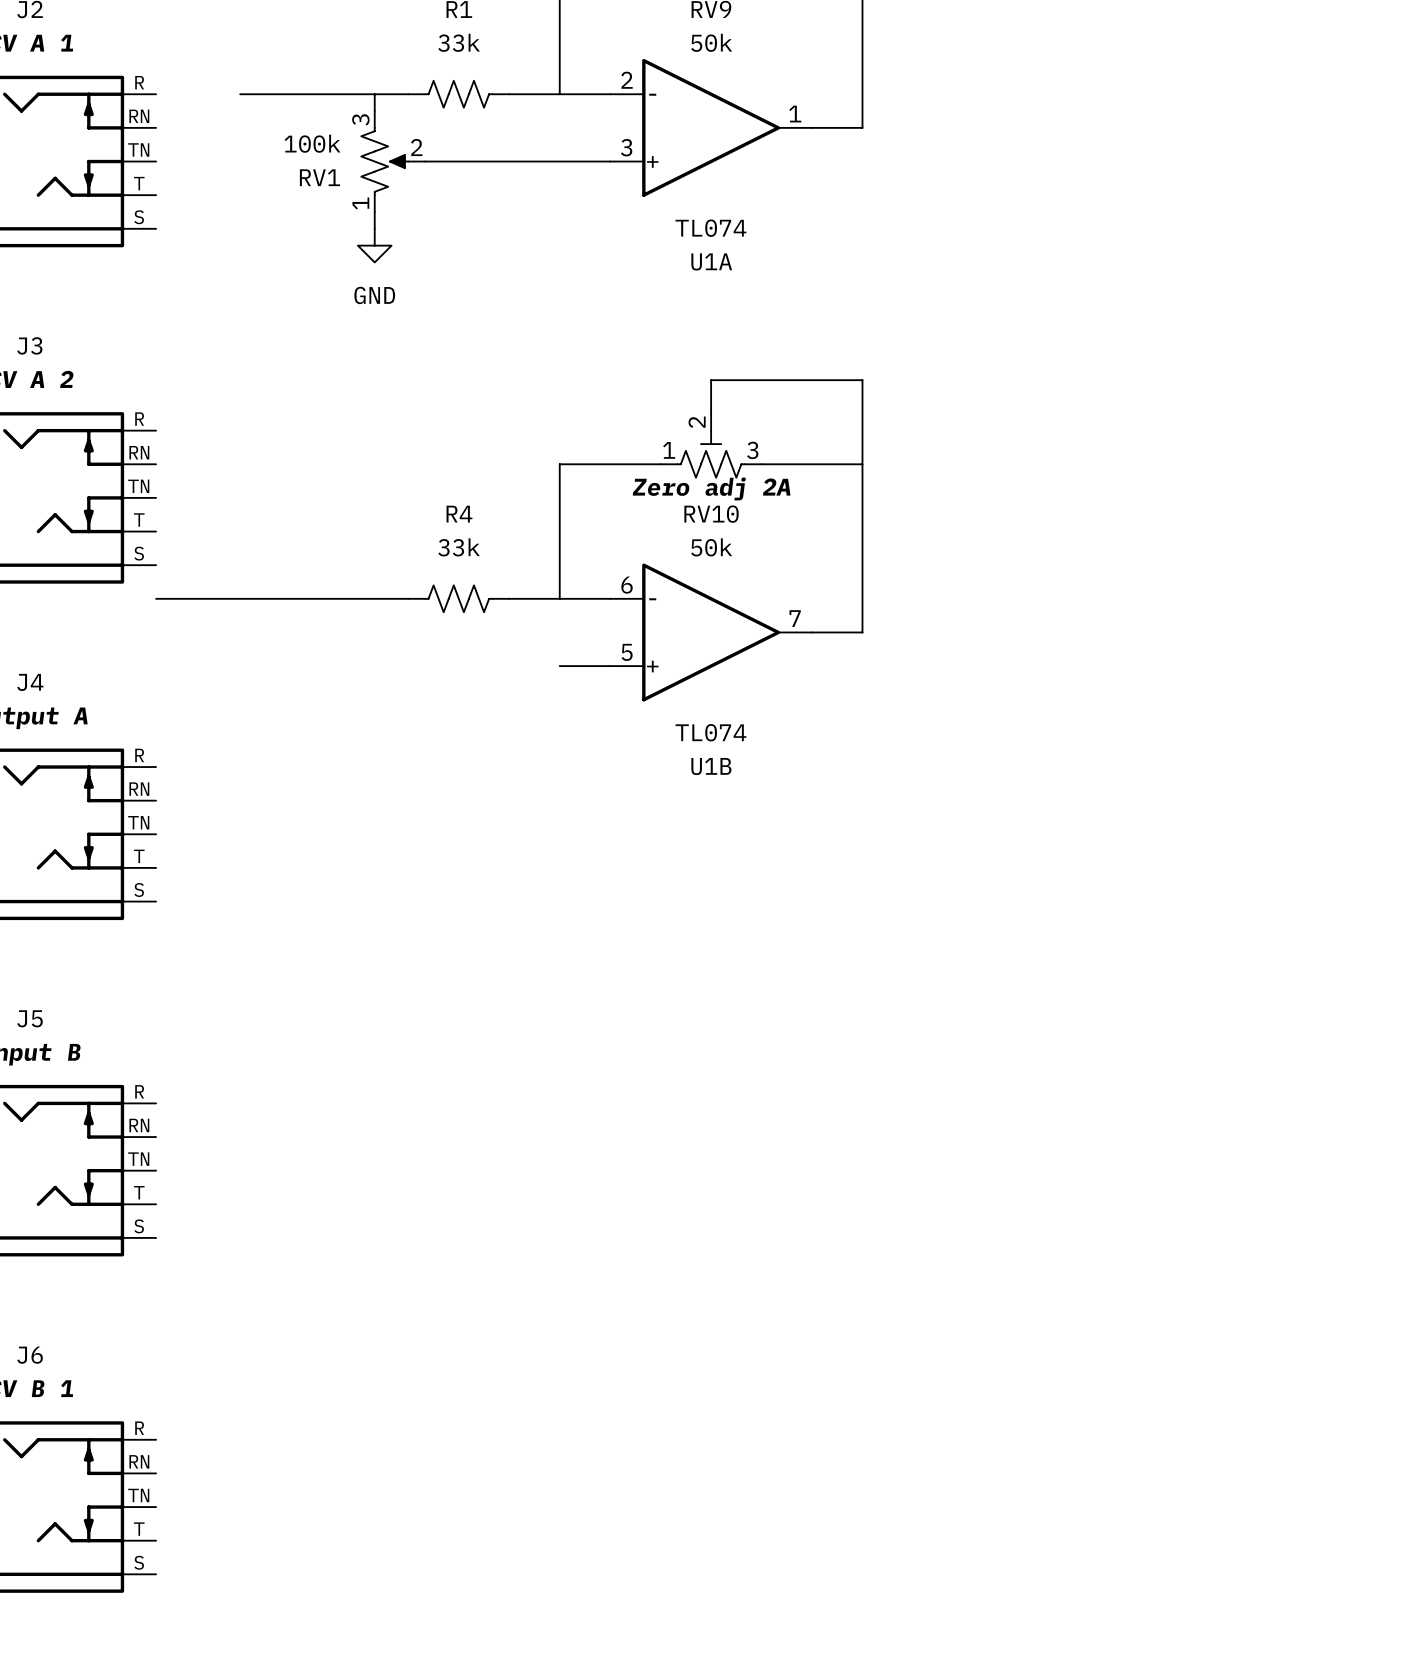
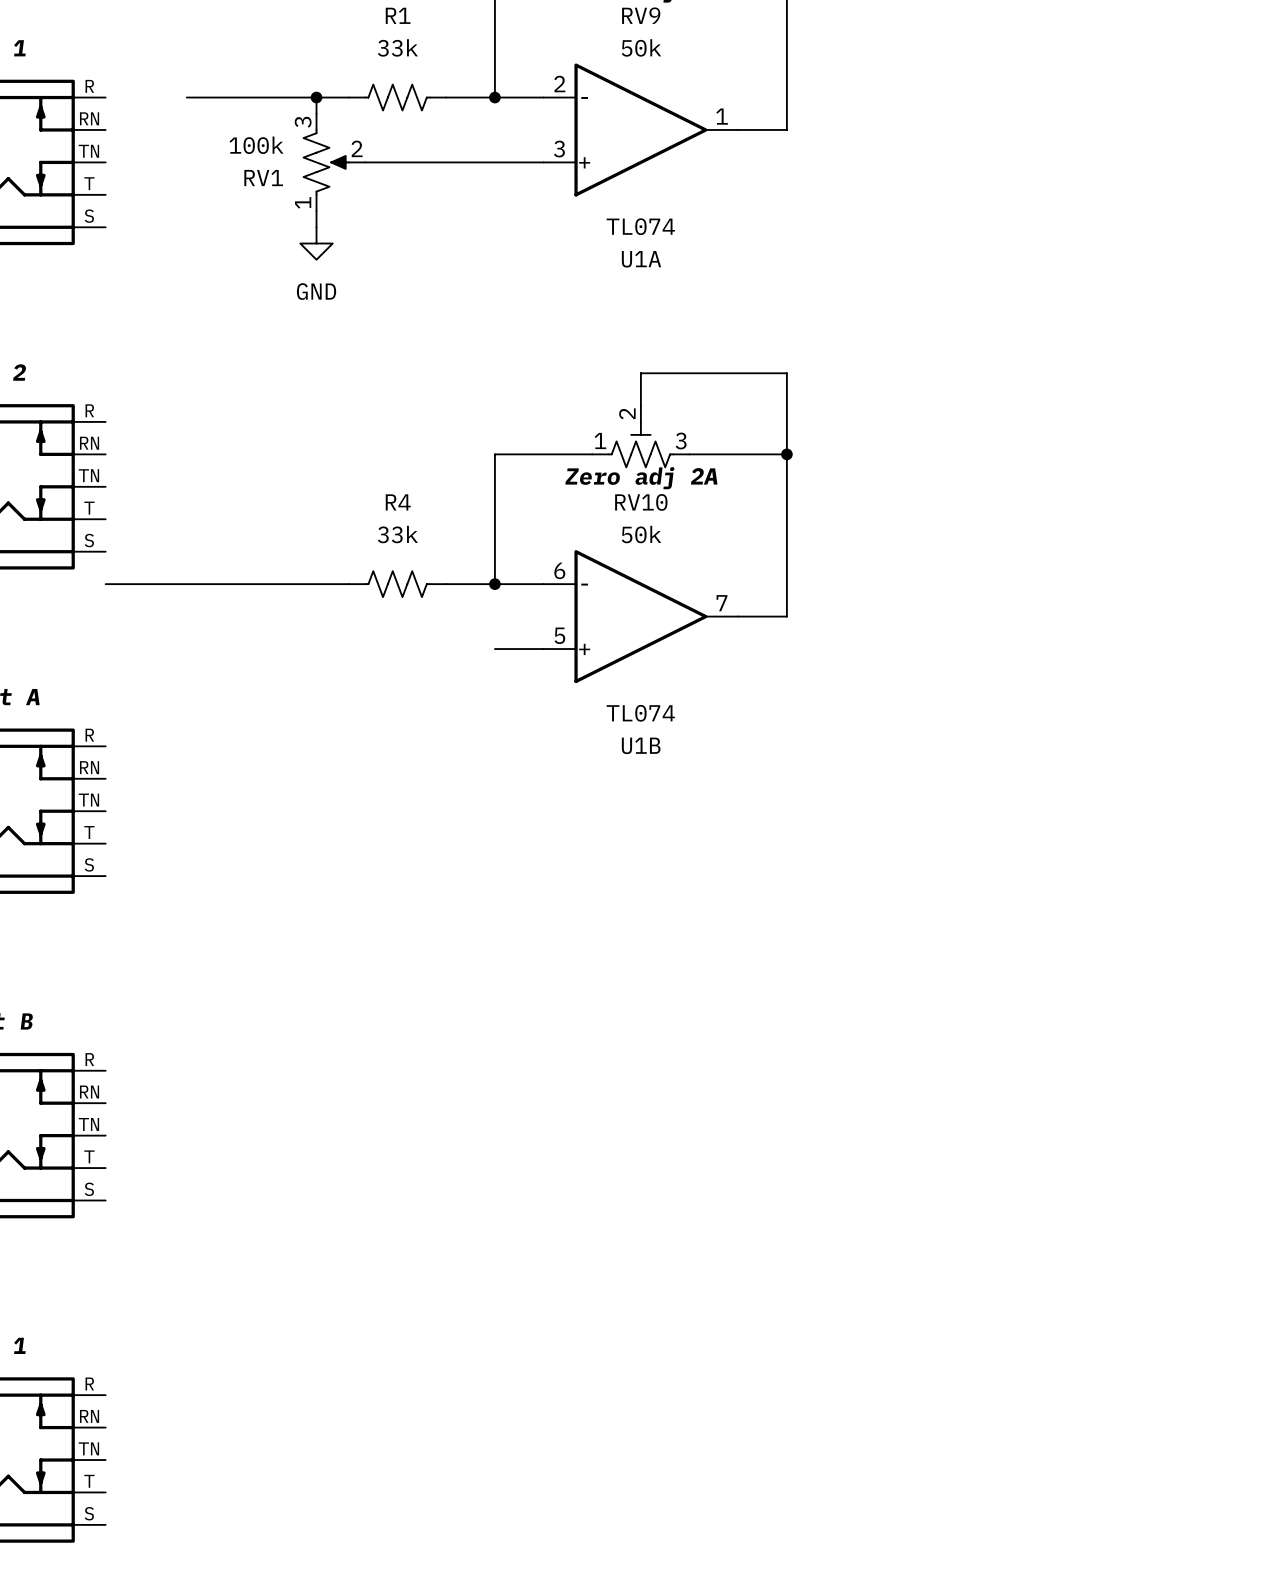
junction: none -> (316, 97)
junction: none -> (494, 97)
junction: none -> (786, 454)
junction: none -> (494, 584)

